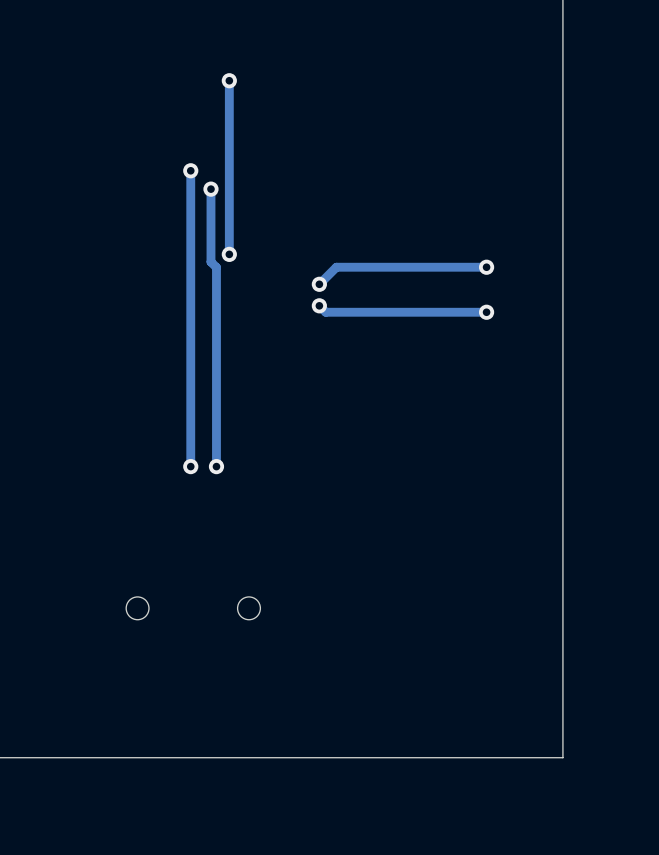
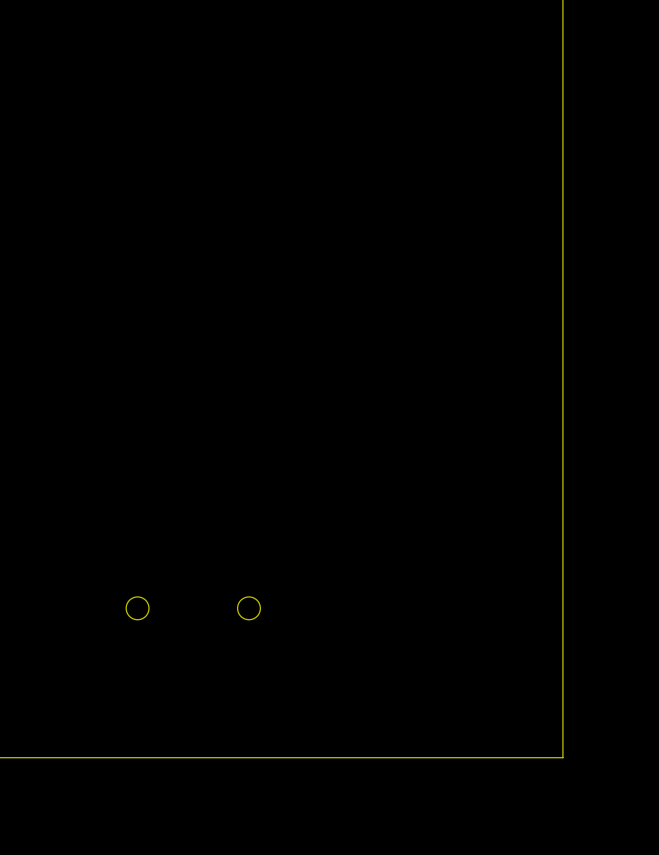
track: (229, 80) (229, 254) -> none
via: (229, 80) -> none
track: (190, 170) (190, 466) -> none
via: (190, 170) -> none
track: (210, 189) (210, 261) (216, 267) (216, 466) -> none
via: (210, 189) -> none
via: (229, 254) -> none
track: (486, 267) (336, 267) (319, 284) -> none
via: (486, 267) -> none
via: (319, 284) -> none
track: (319, 305) (325, 312) (486, 312) -> none
via: (319, 305) -> none
via: (486, 312) -> none
via: (190, 466) -> none
via: (216, 466) -> none

